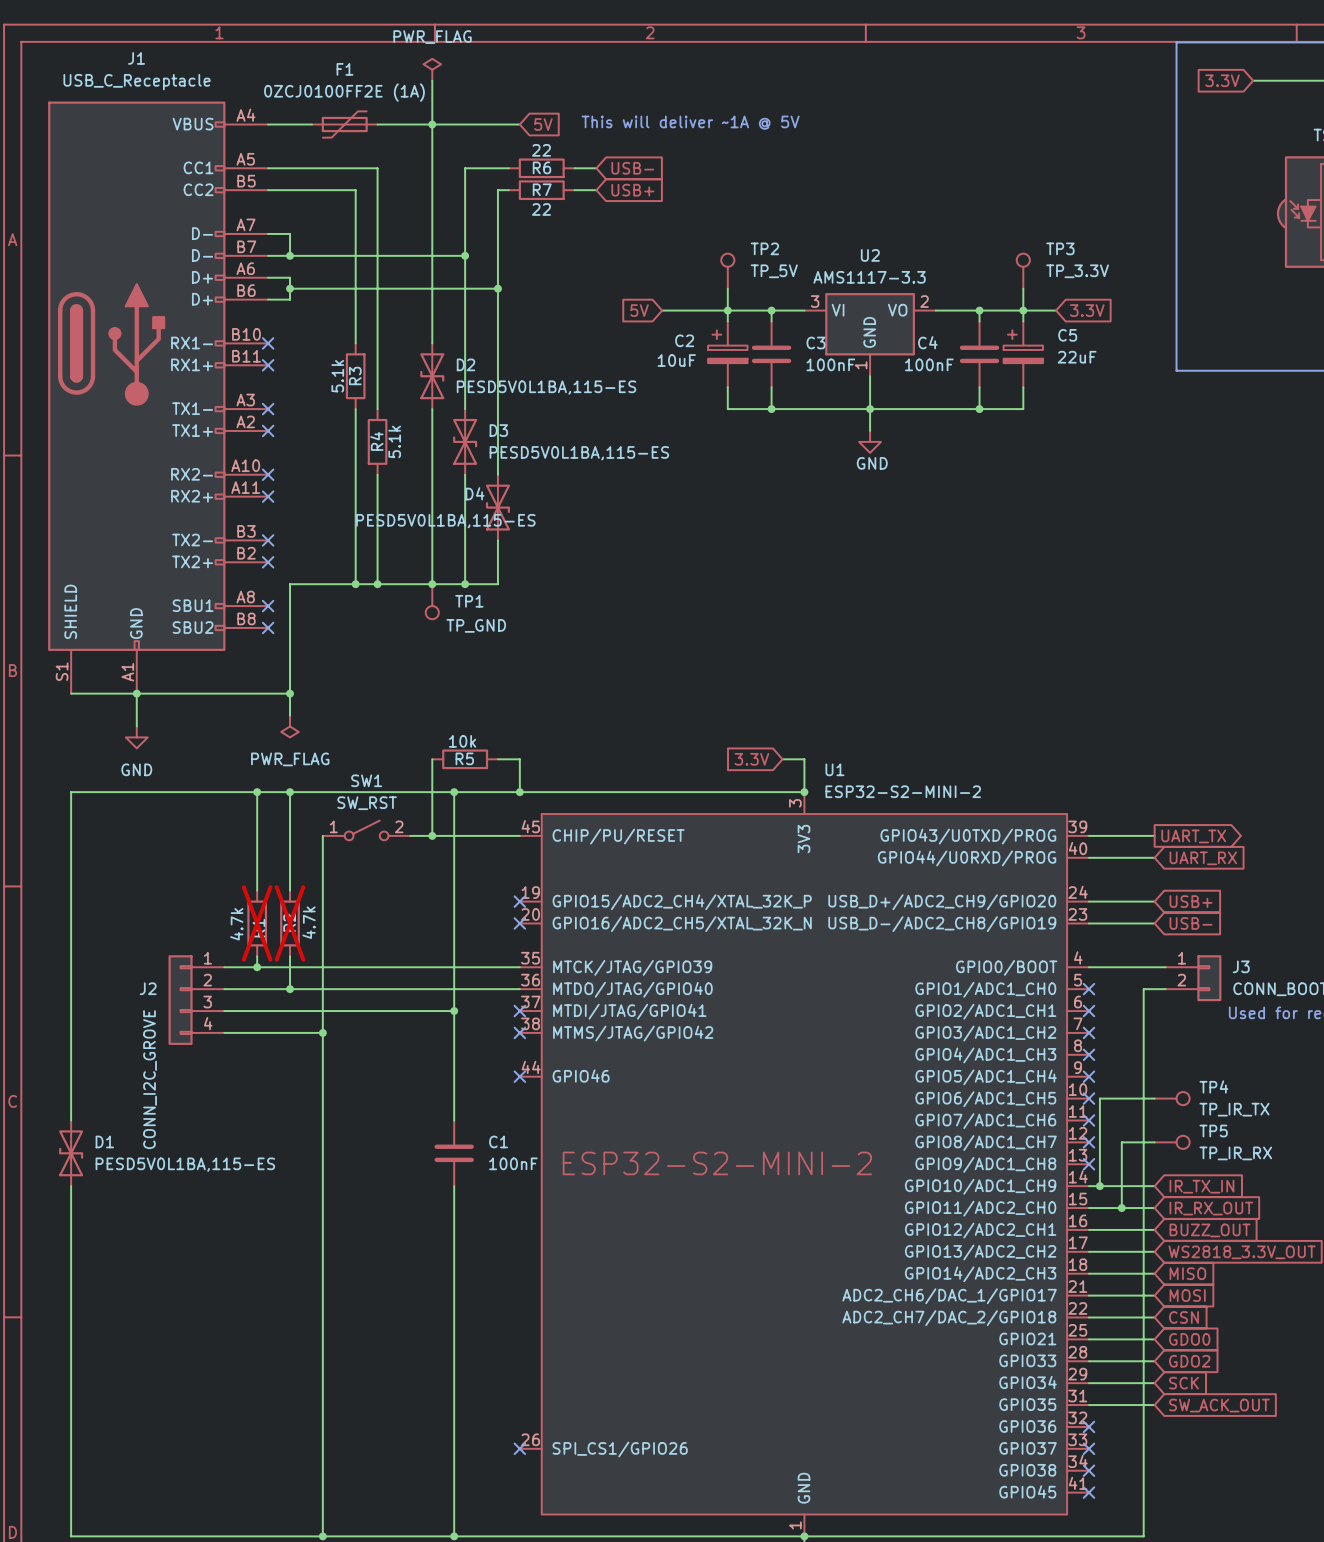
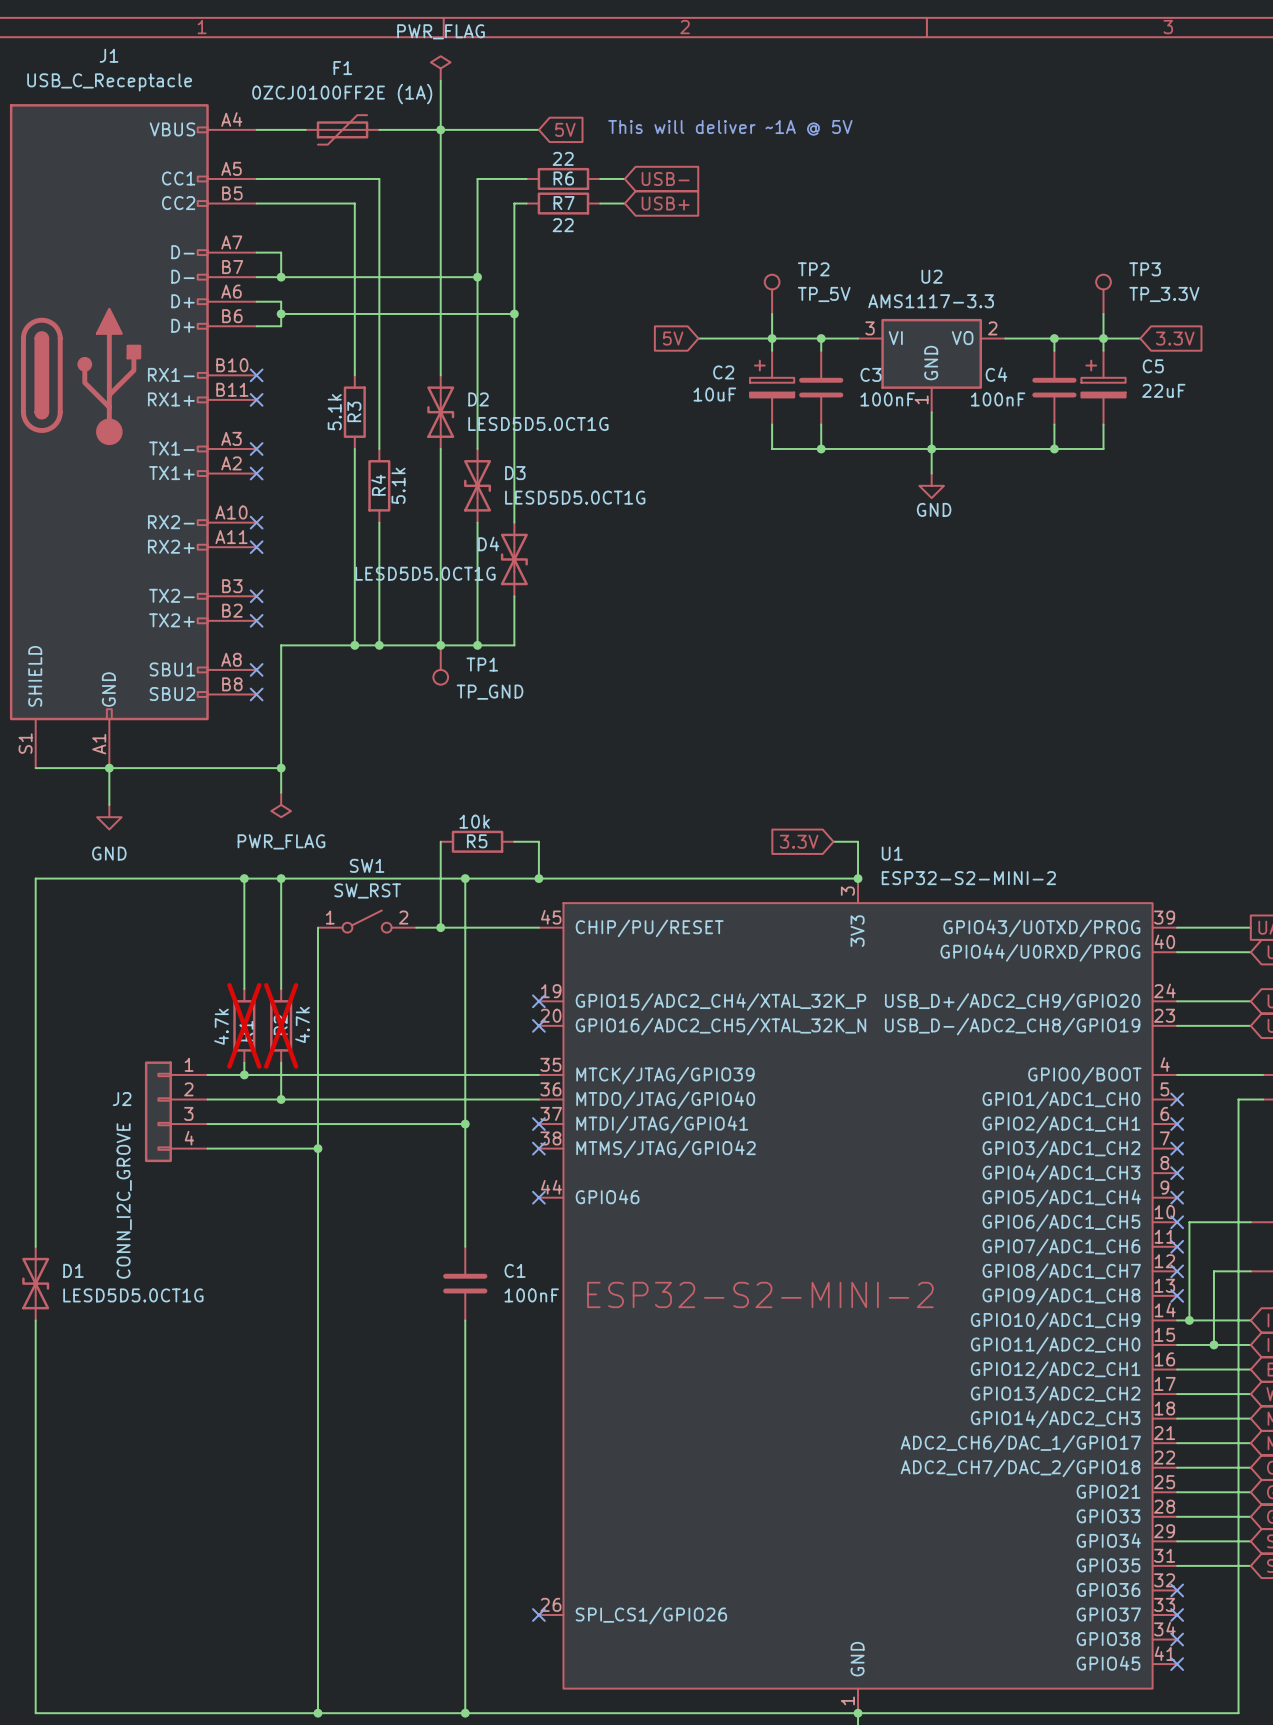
D2 value: PESD5V0L1BA,115-ES (546, 387) -> LESD5D5.0CT1G (538, 423)
D3 value: PESD5V0L1BA,115-ES (579, 453) -> LESD5D5.0CT1G (575, 497)
D4 value: PESD5V0L1BA,115-ES (445, 521) -> LESD5D5.0CT1G (425, 573)
D1 value: PESD5V0L1BA,115-ES (185, 1164) -> LESD5D5.0CT1G (133, 1295)

